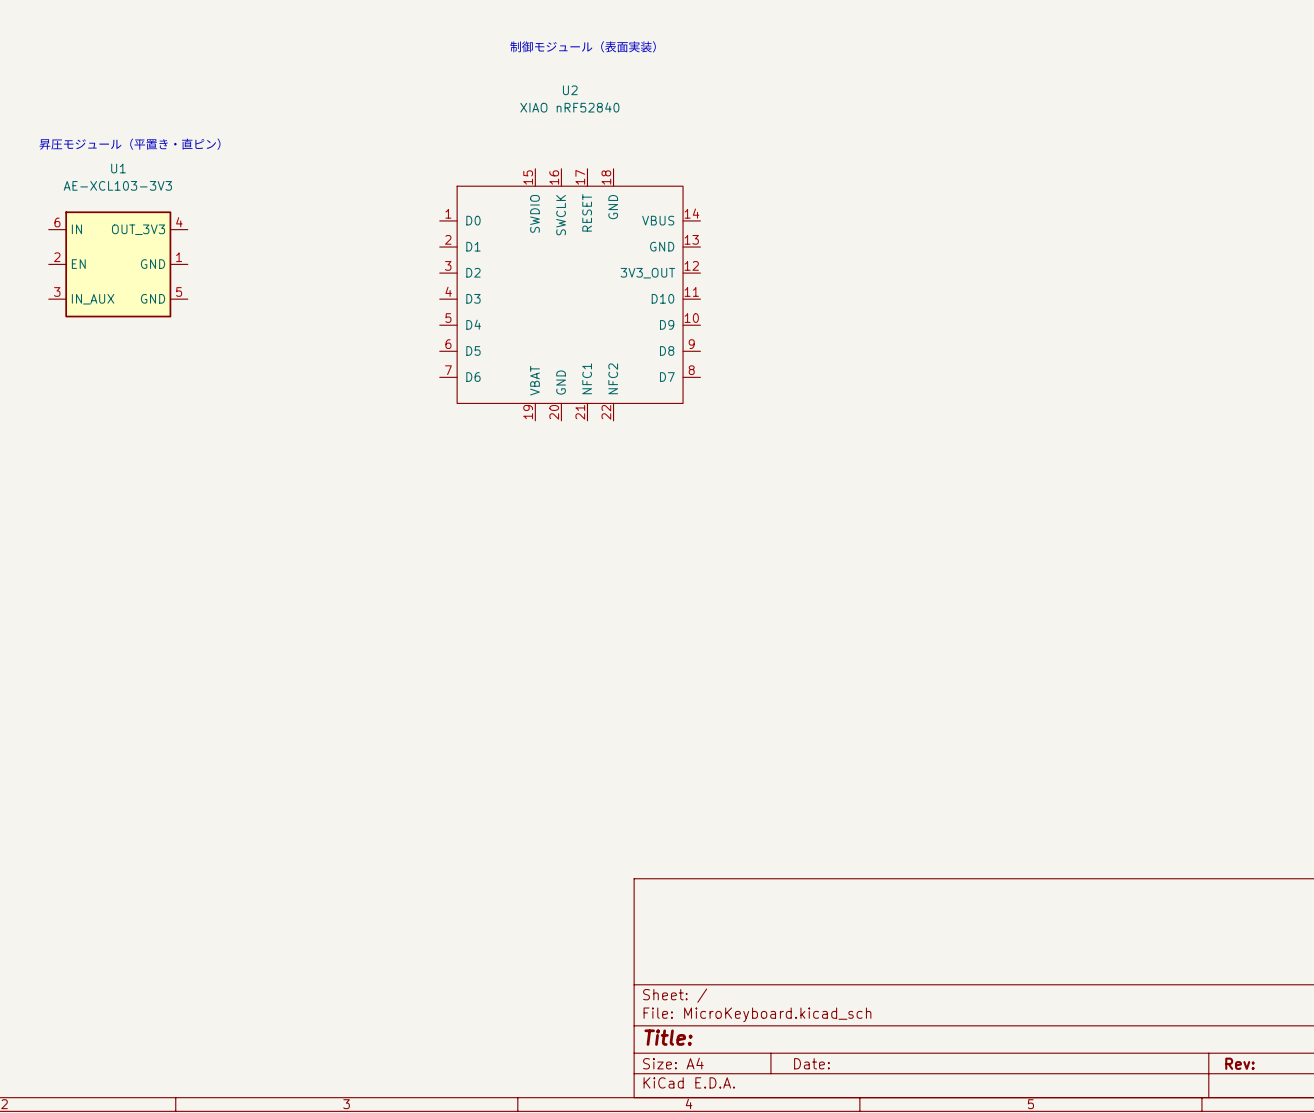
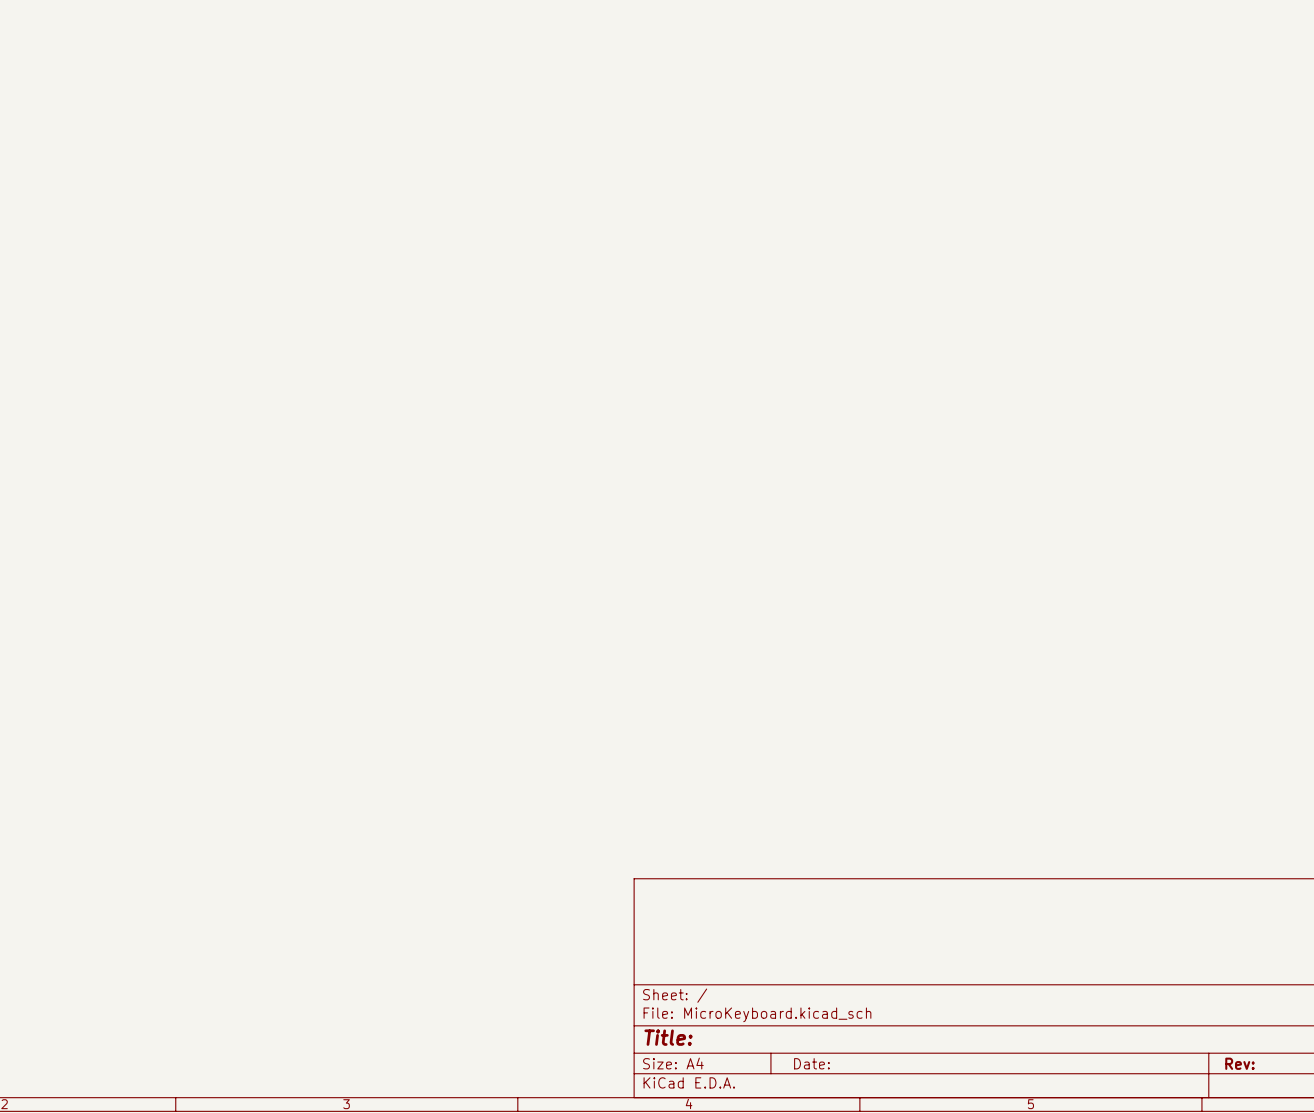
text: 制御モジュール（表面実装） (583, 46) -> none
text: 昇圧モジュール（平置き・直ピン） (130, 144) -> none
U1: AE-XCL103-3V3 (118, 264) -> none
U2: XIAO nRF52840 (570, 294) -> none

